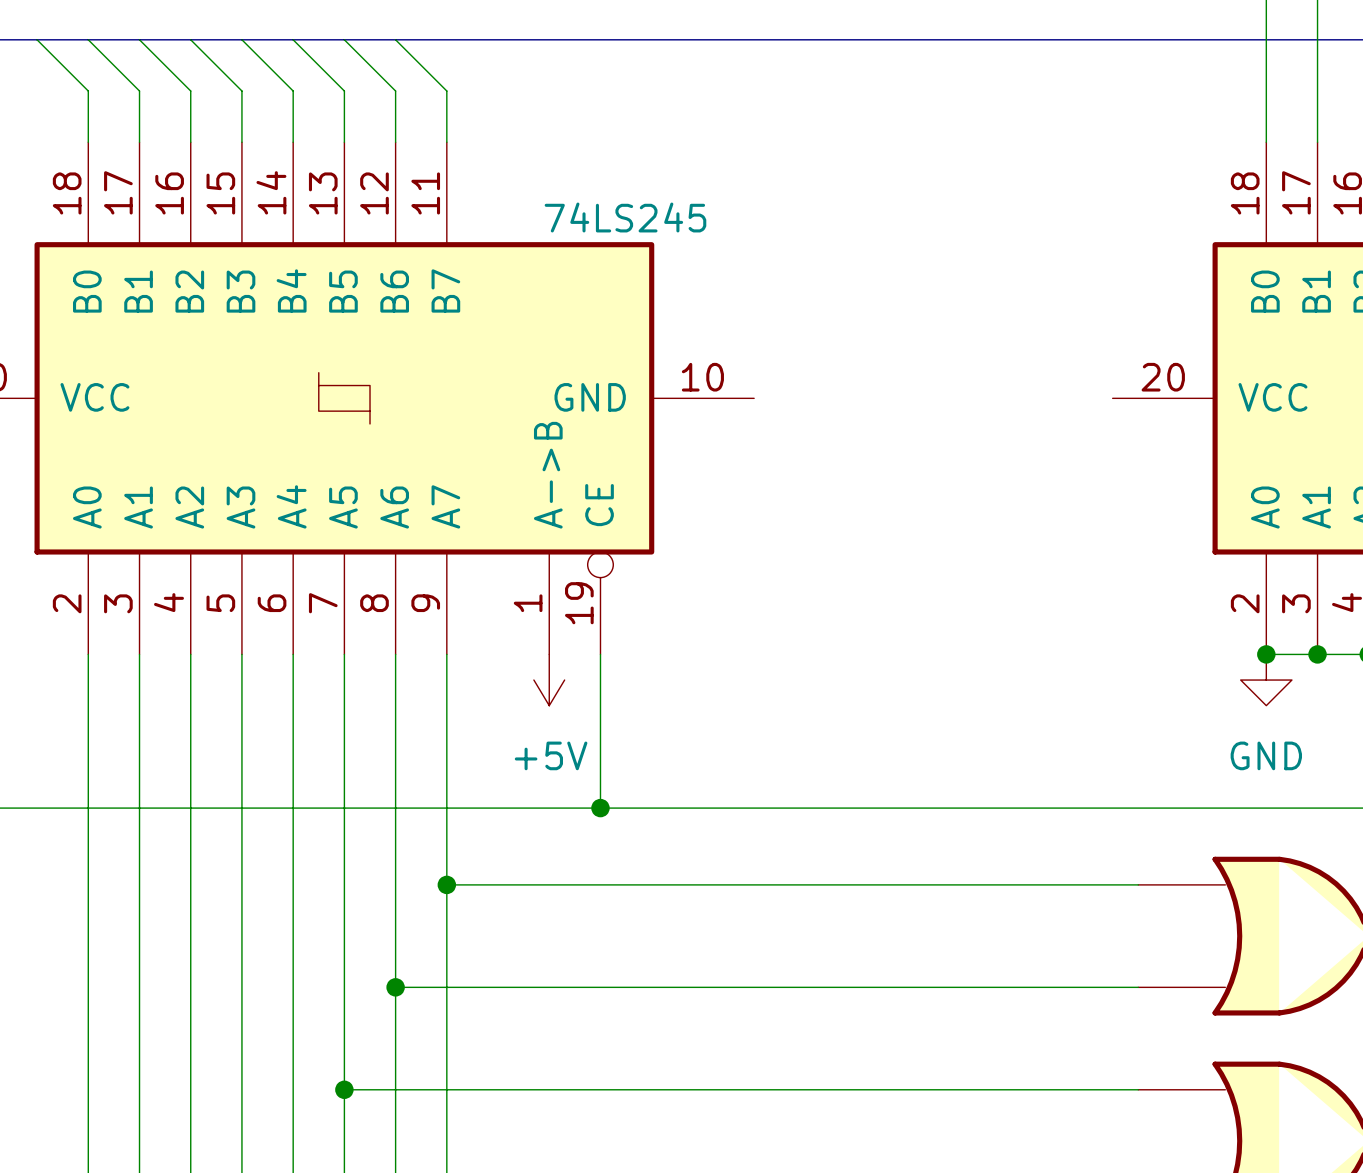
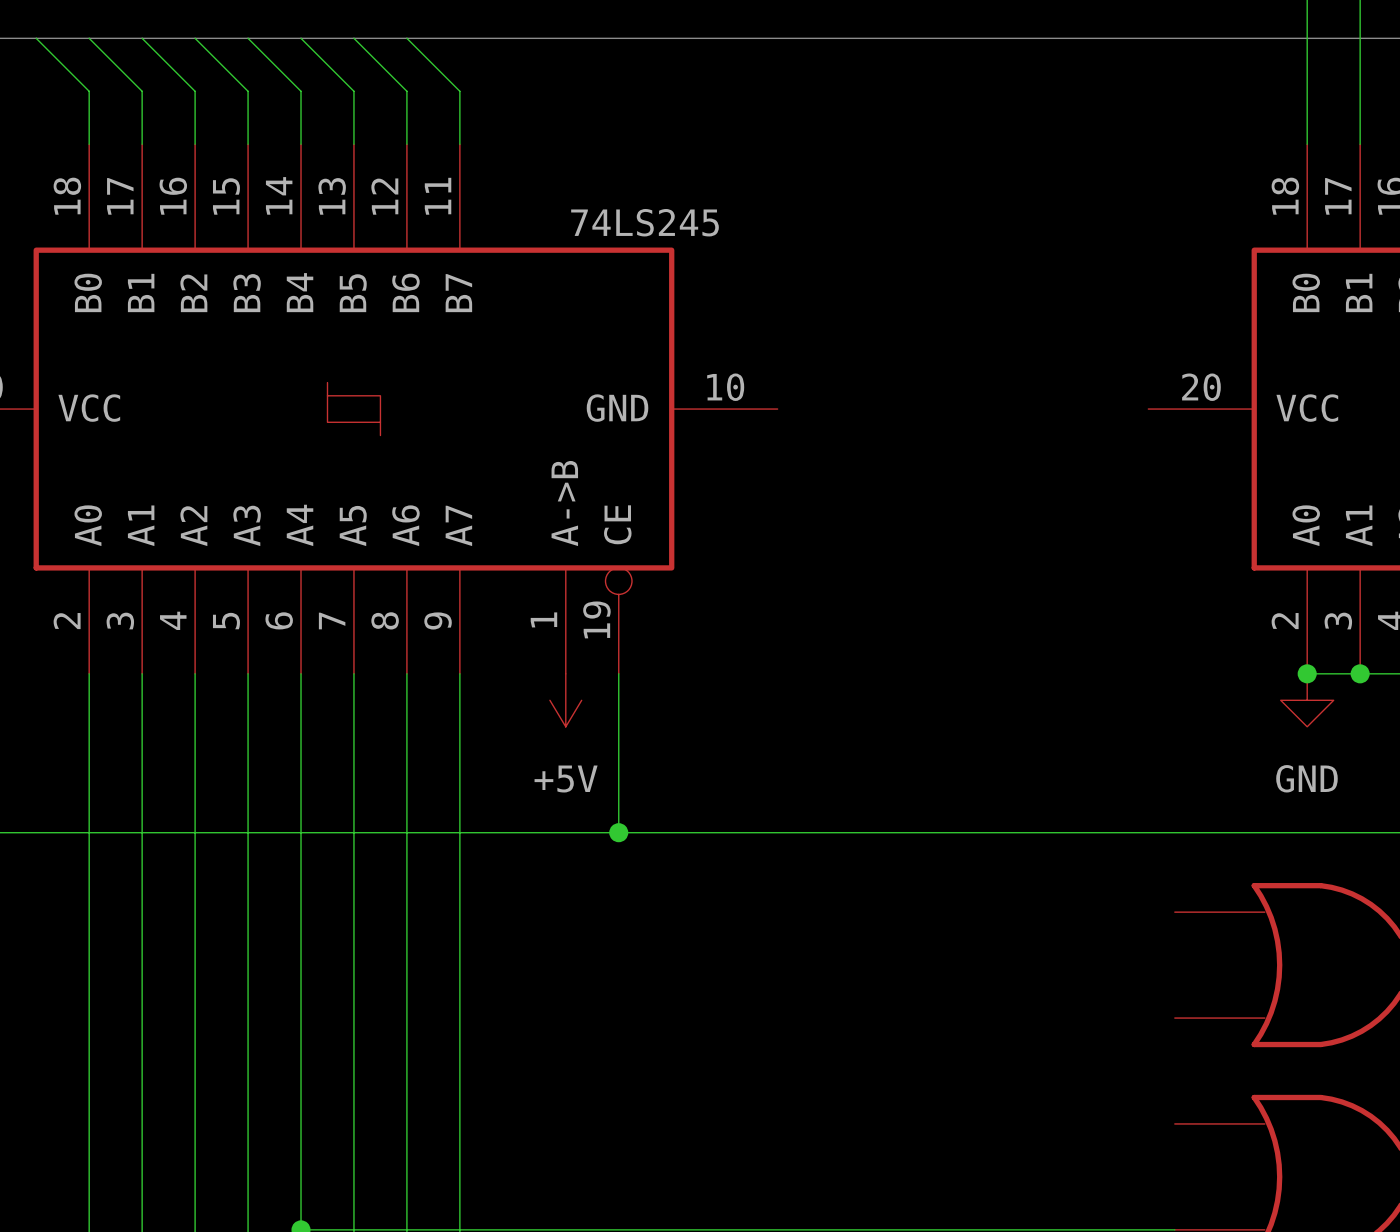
wire: (446, 884) (1138, 884) -> none
junction: (446, 884) -> none
wire: (395, 987) (1138, 987) -> none
junction: (395, 987) -> none
wire: (344, 1089) (1138, 1089) -> none
junction: (344, 1089) -> none

